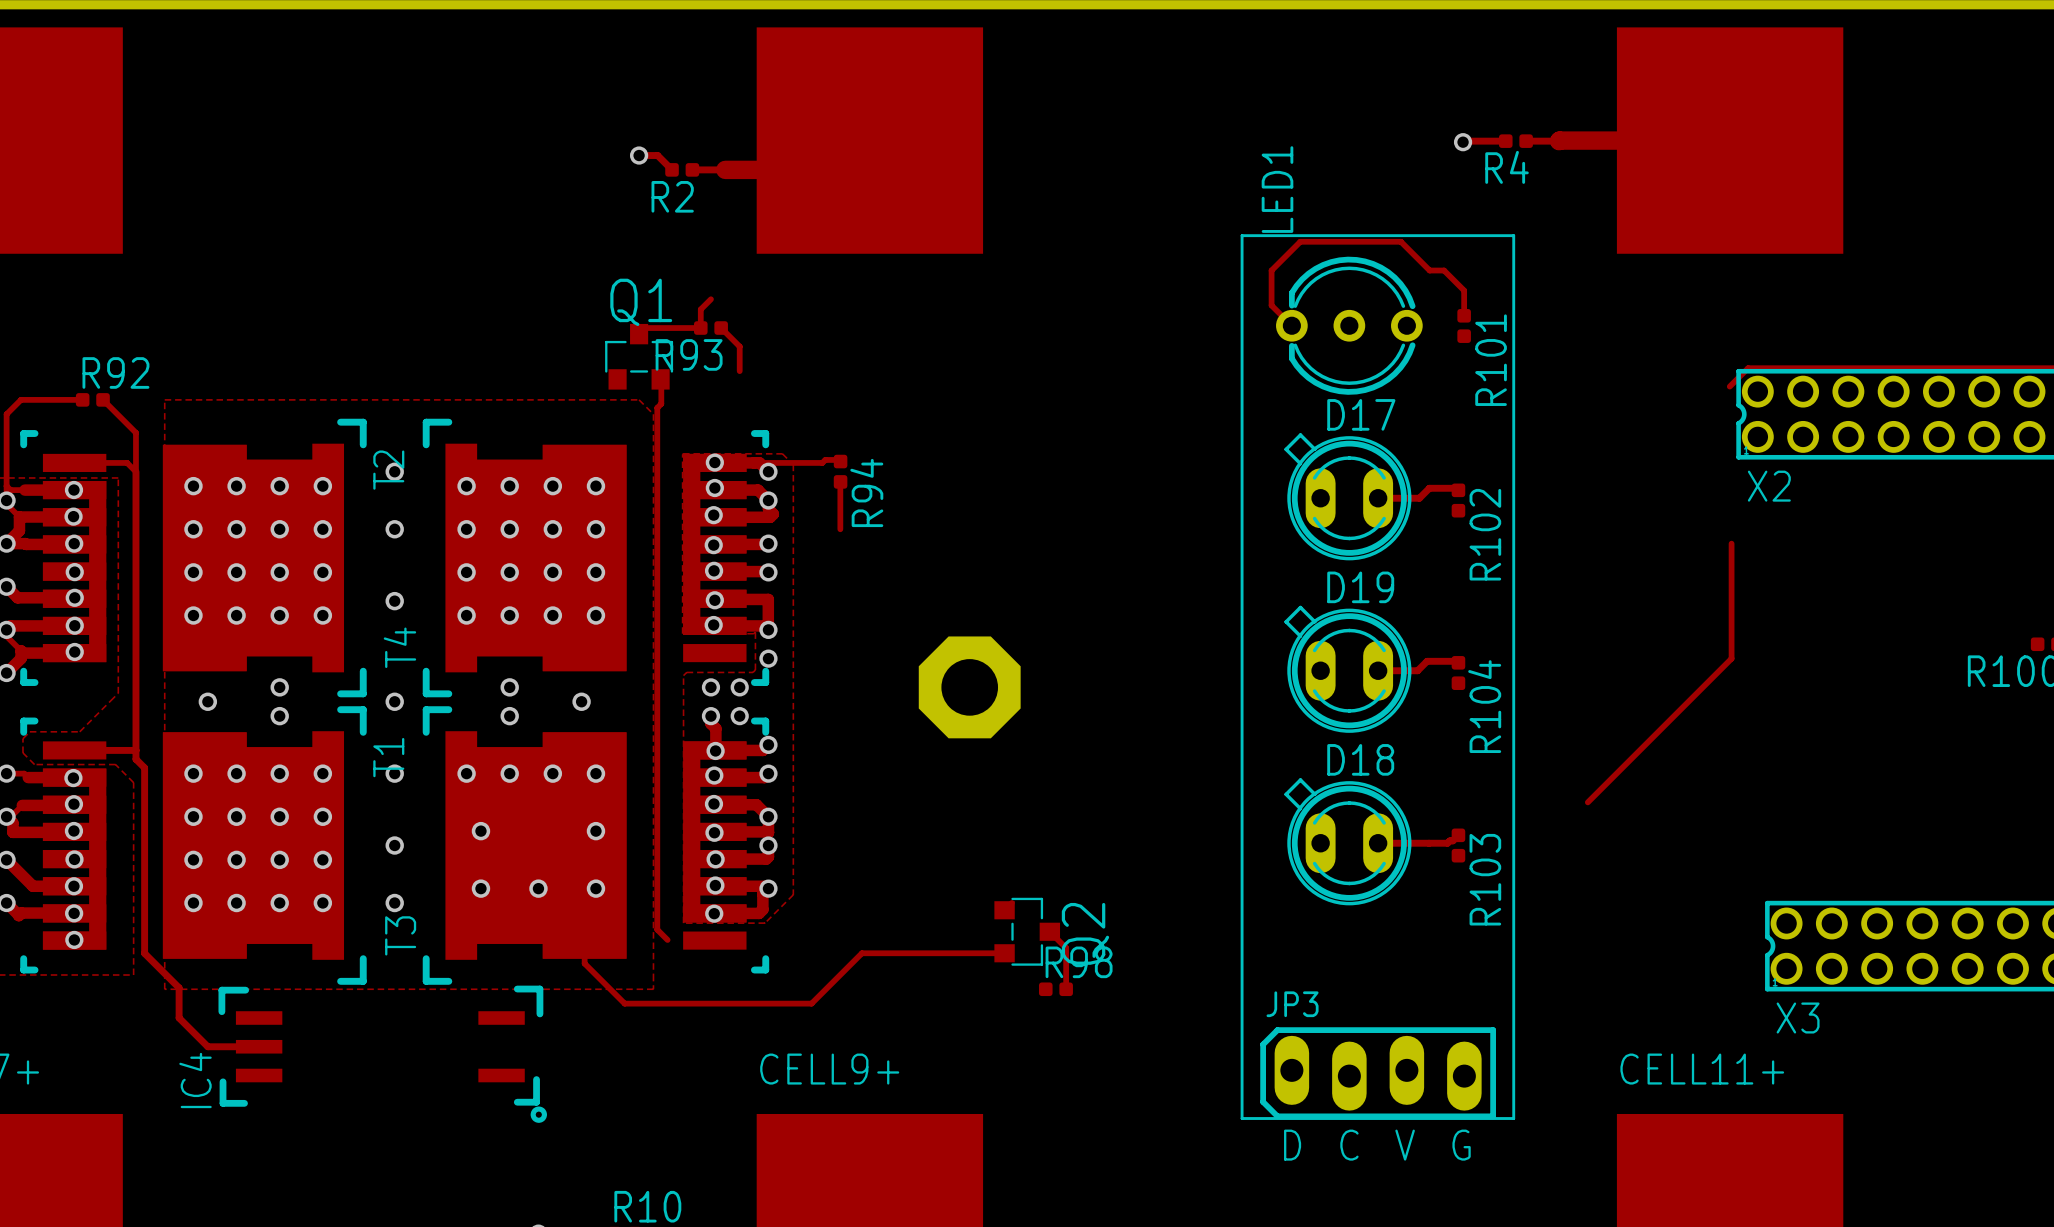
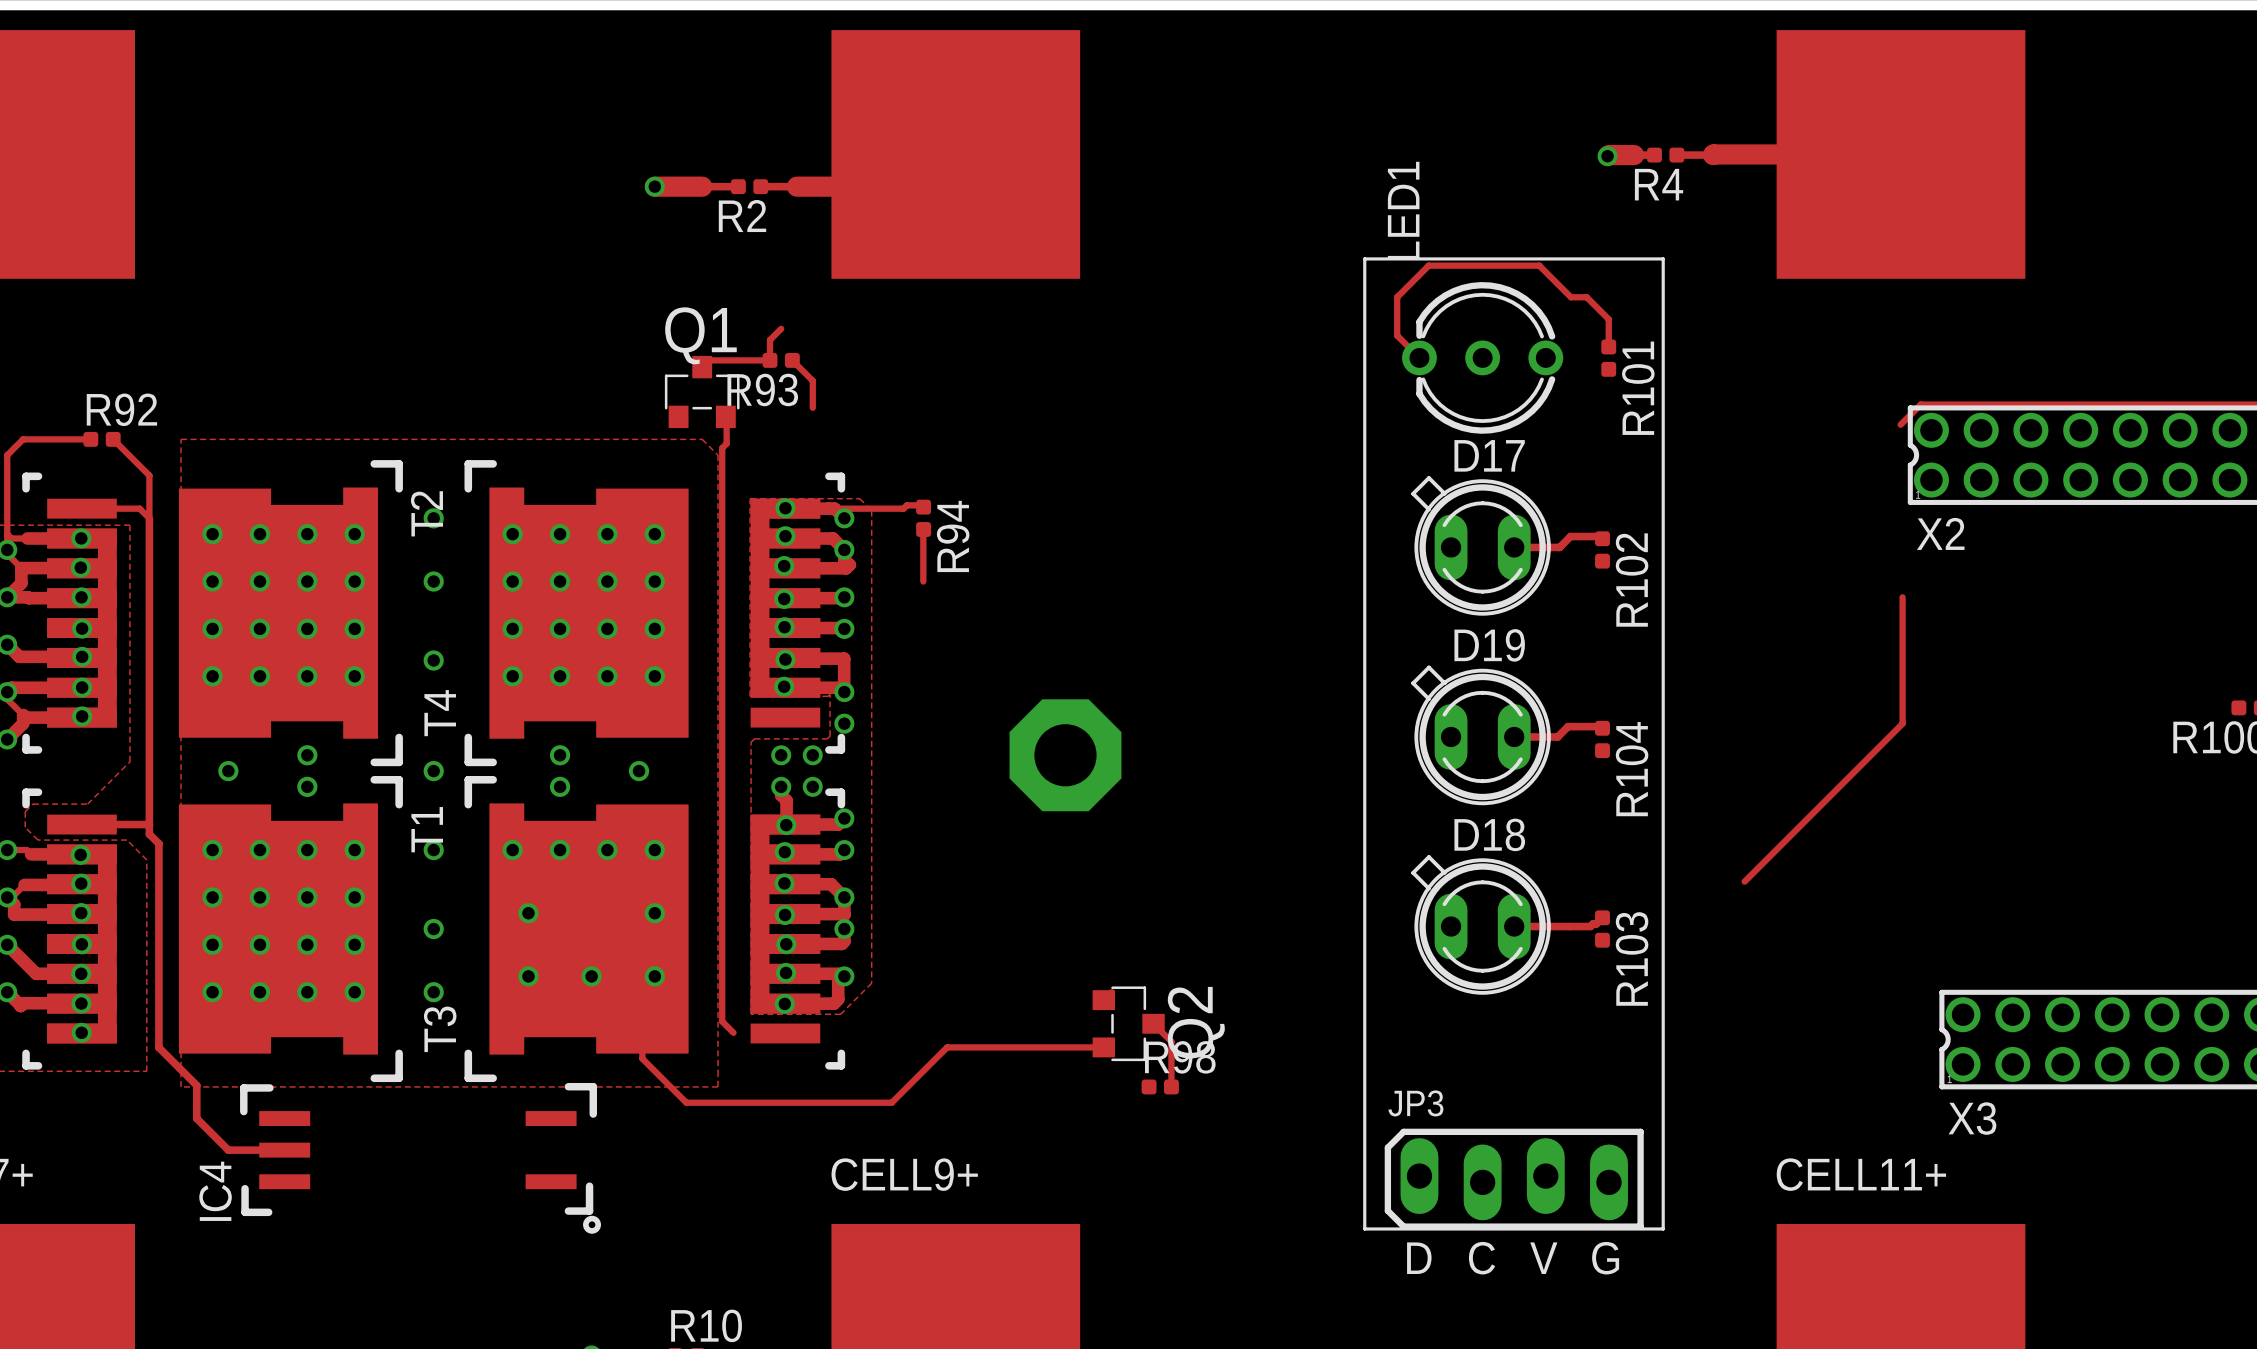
track width: thin (1464, 141) (1487, 141) -> thick (1608, 155) (1634, 155)
track: (639, 155) (657, 155) (672, 169) -> (654, 186) (738, 186)
via position: (639, 155) -> (654, 186)

